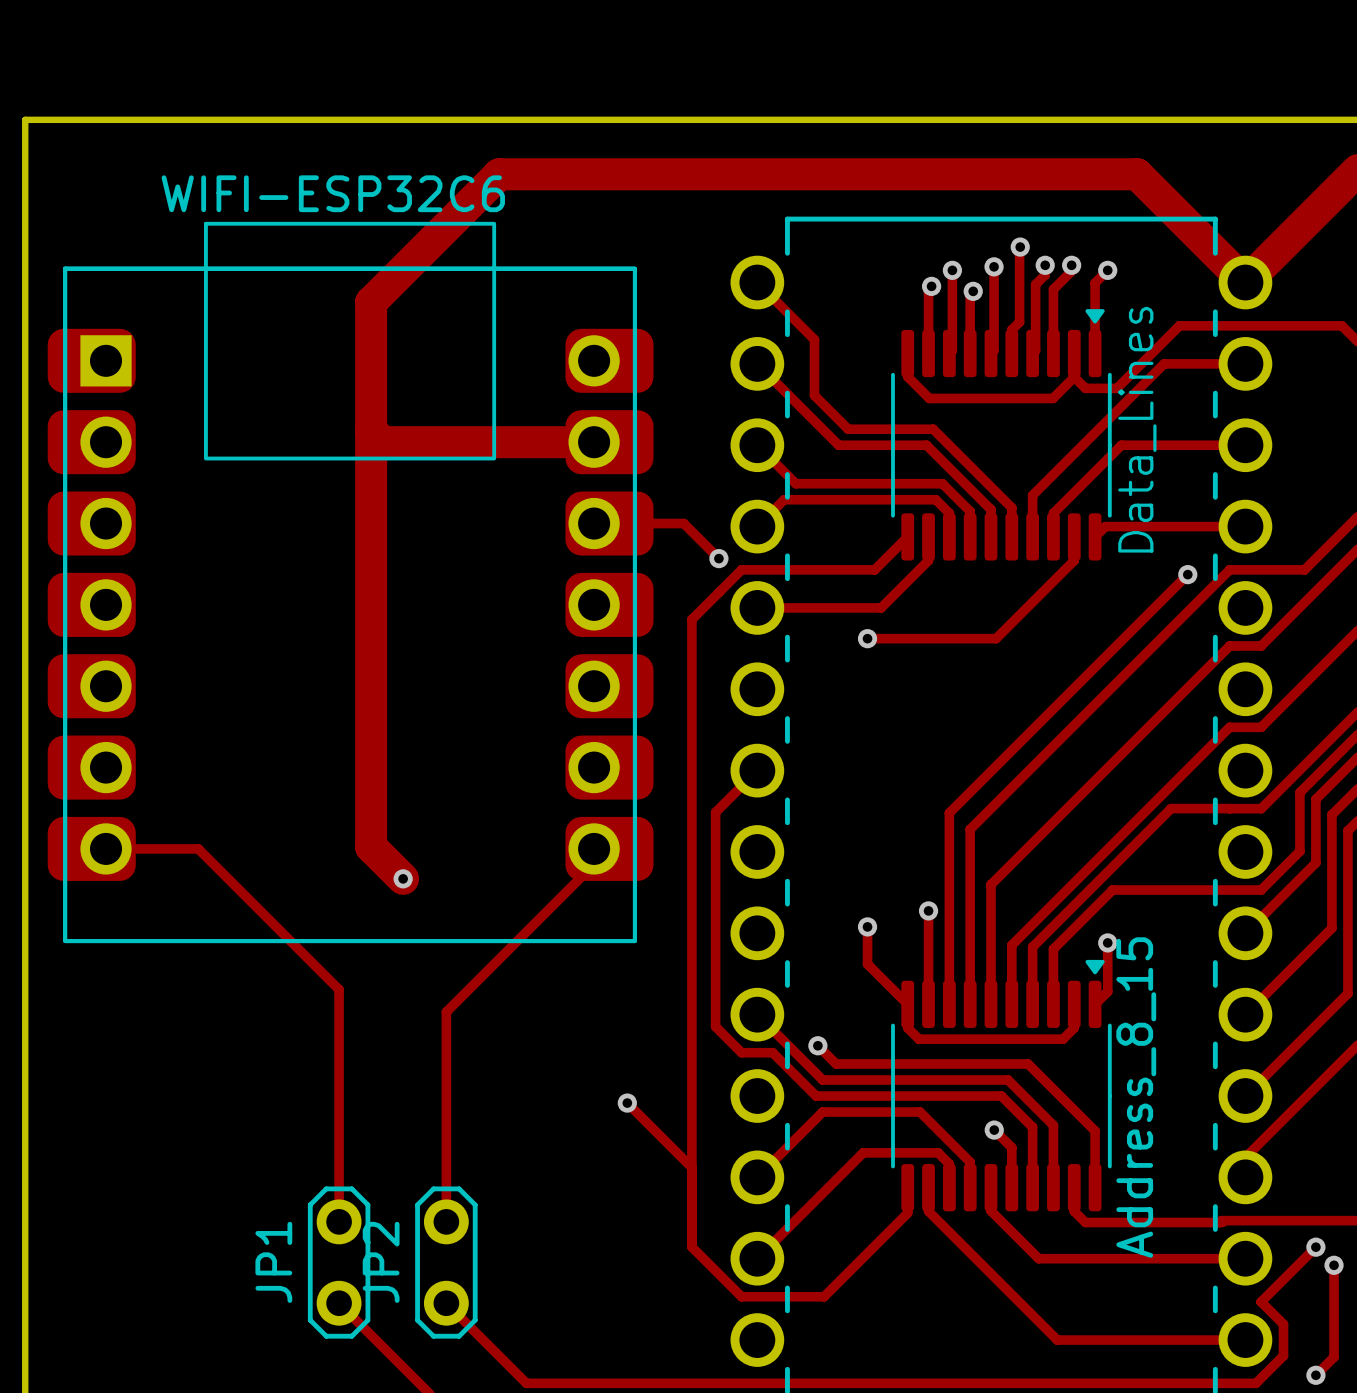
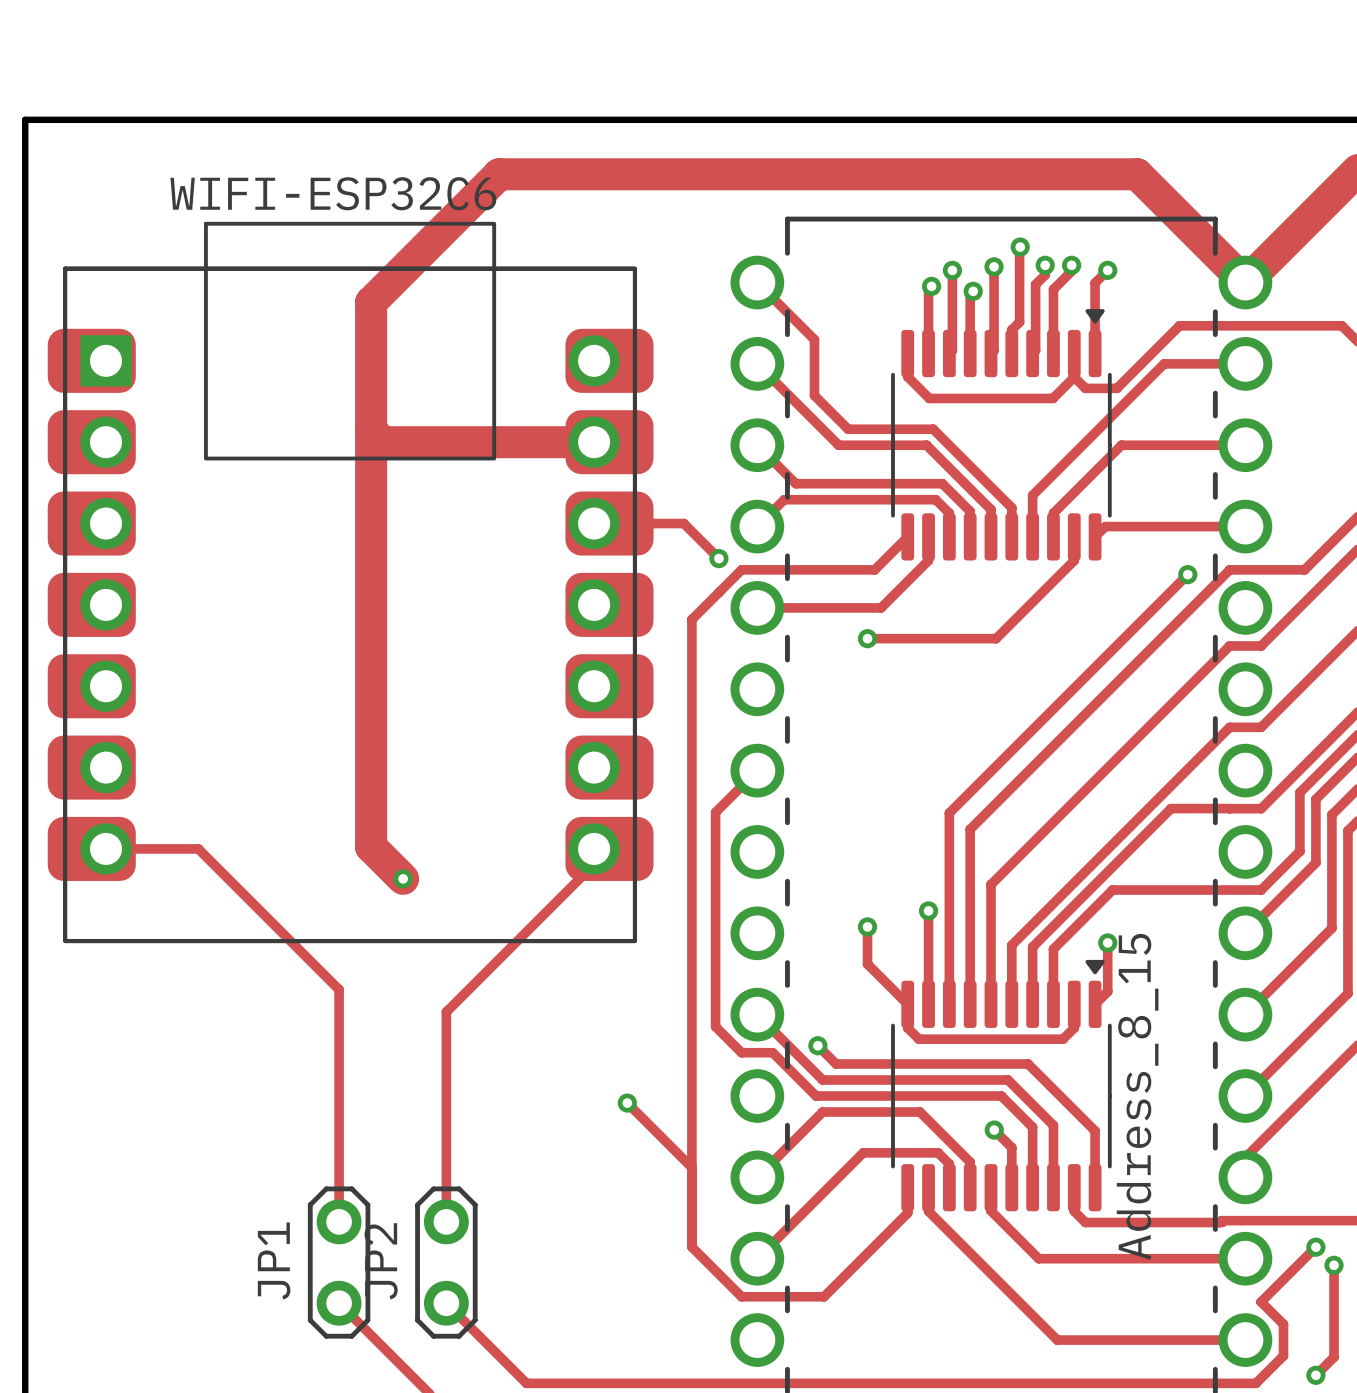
text: Data_Lines (1137, 429) -> none

